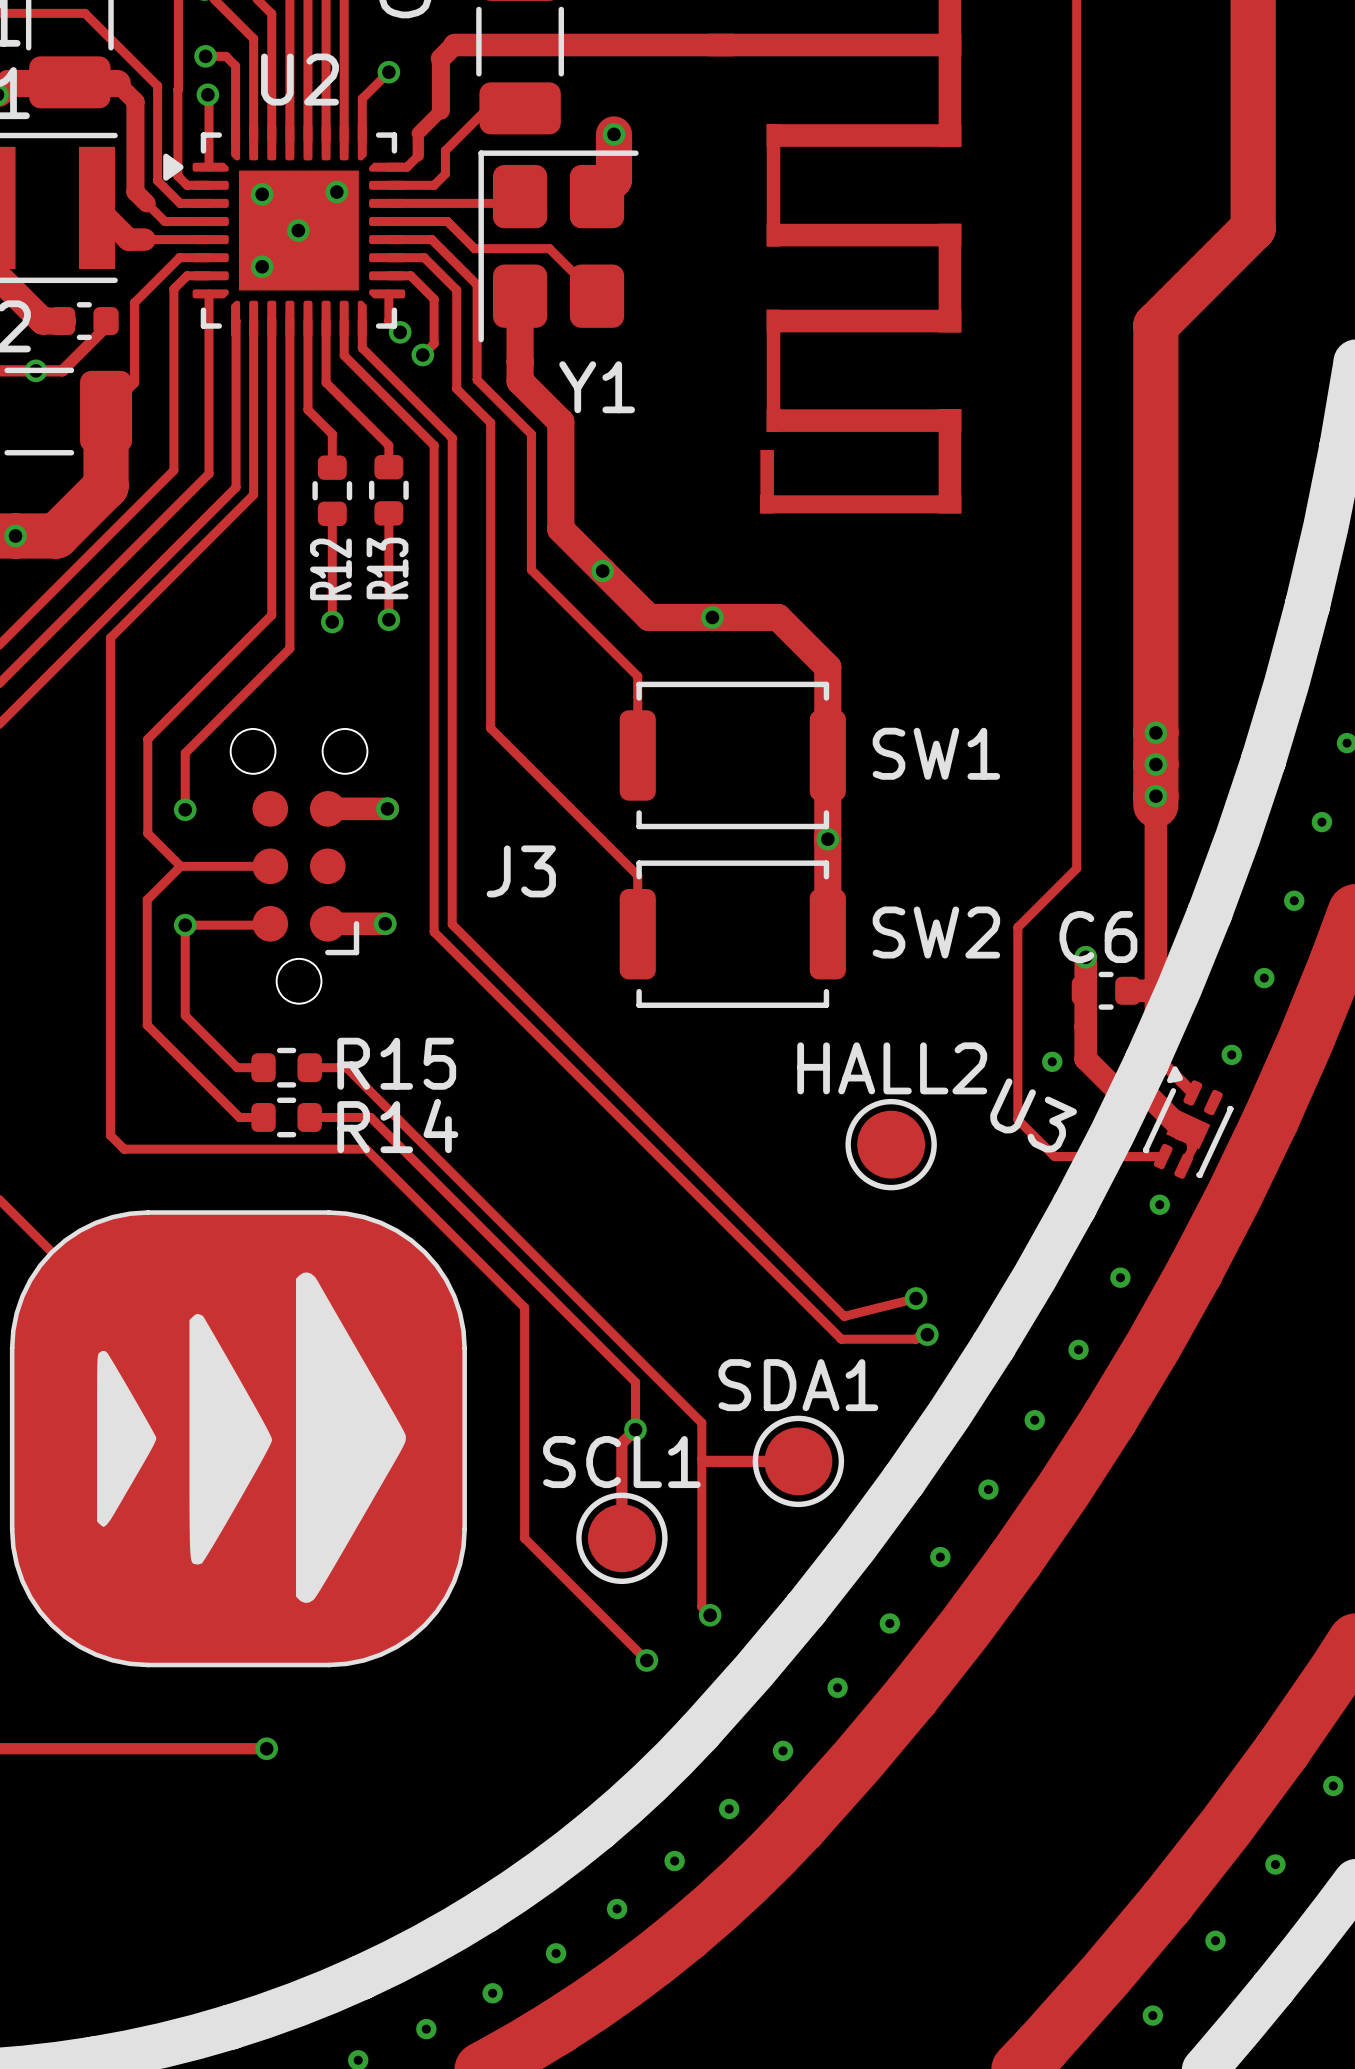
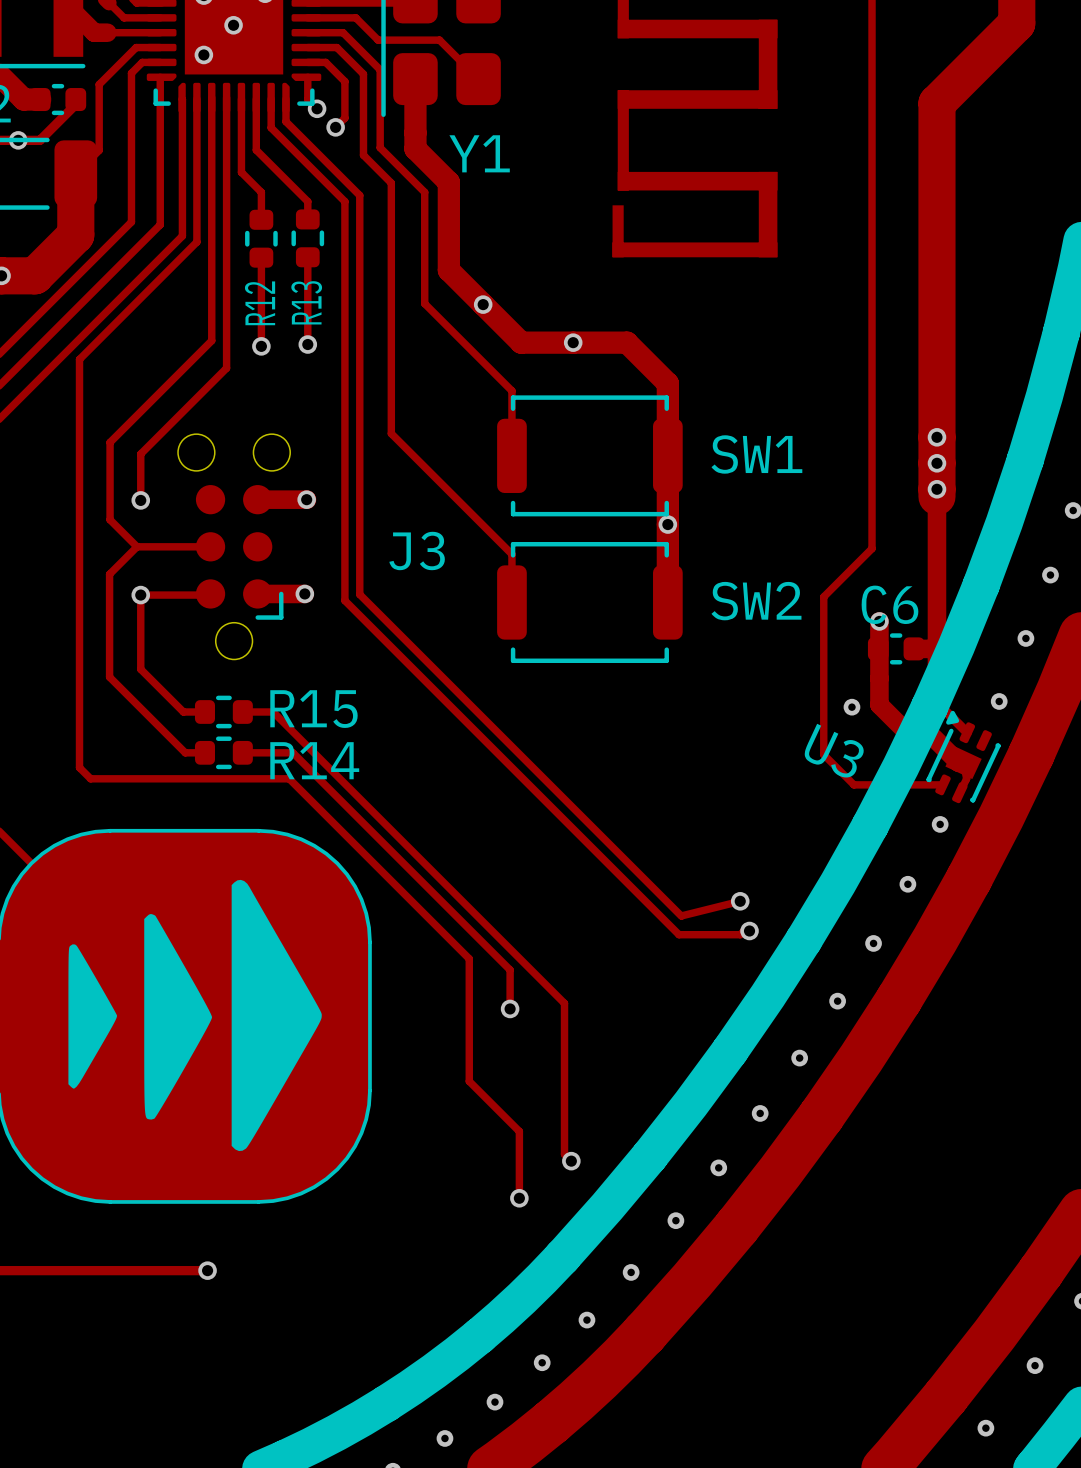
HALL2: (891, 1144) -> none
track: (524, 1307) (524, 1538) (646, 1660) -> (419, 908) (469, 958) (469, 1081) (519, 1131) (519, 1198)
track: (635, 1429) (621, 1443) (621, 1538) -> none
track: (704, 1461) (798, 1461) -> none
SDA1: (798, 1461) -> none
SCL1: (621, 1538) -> none

